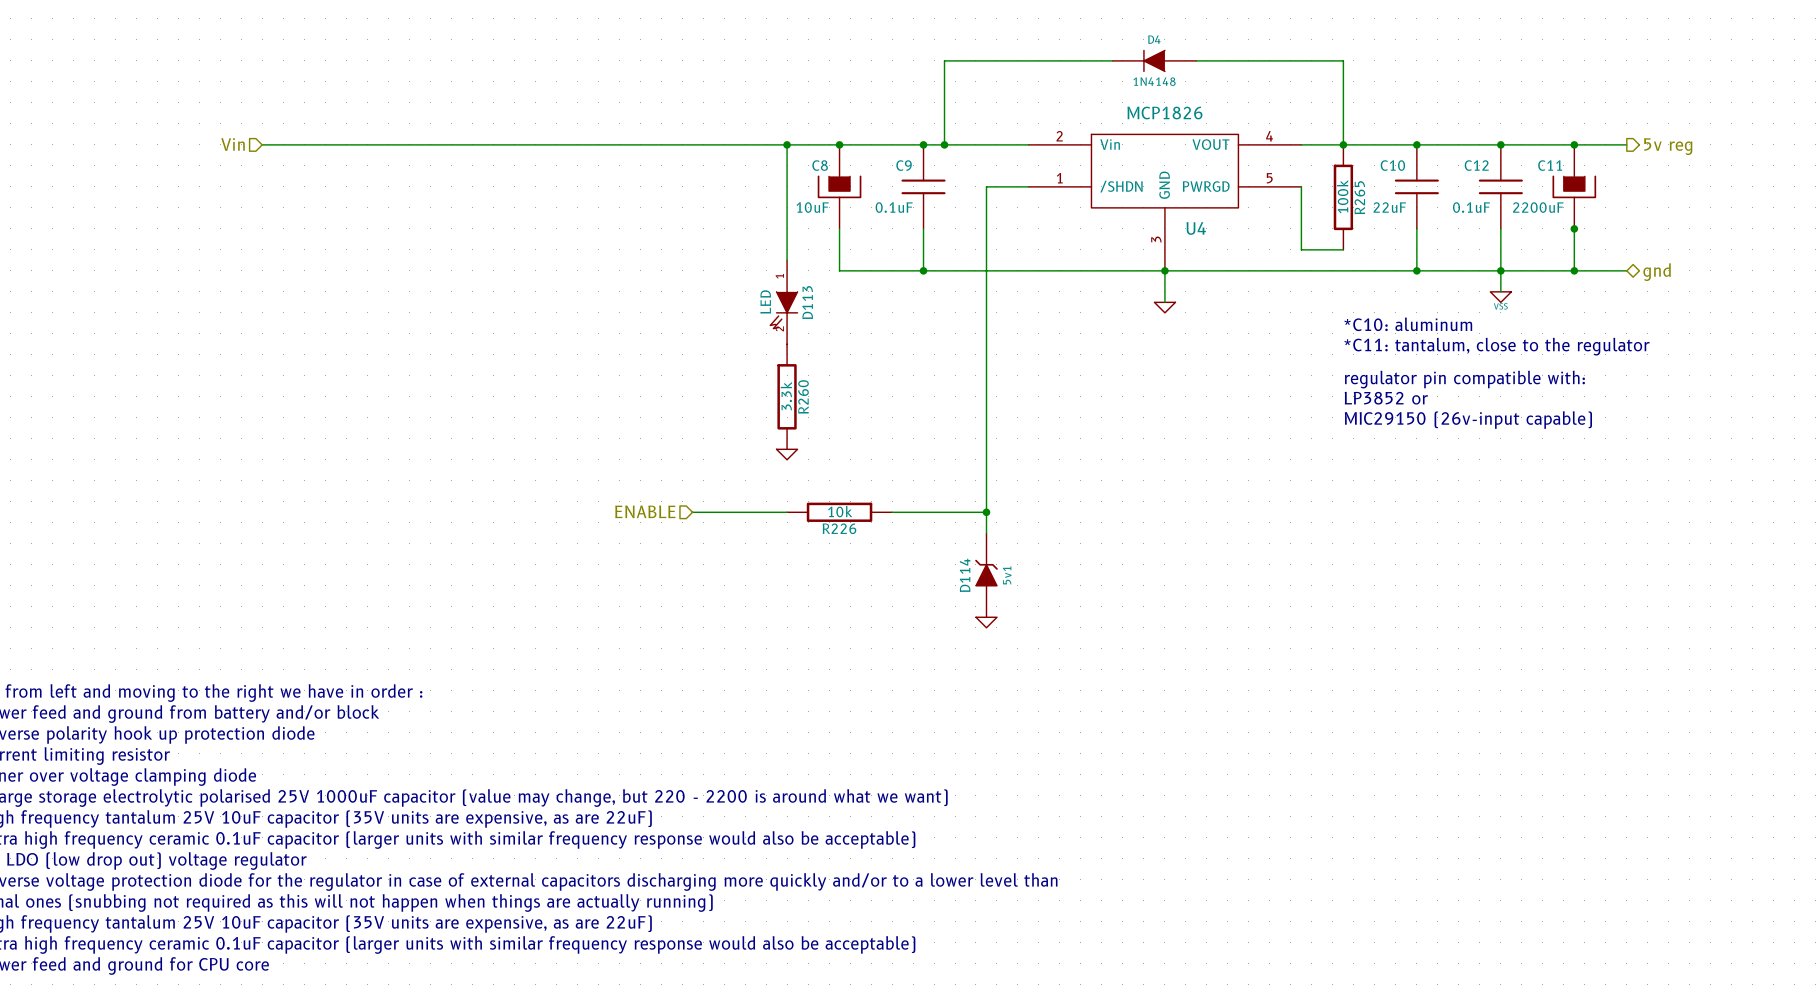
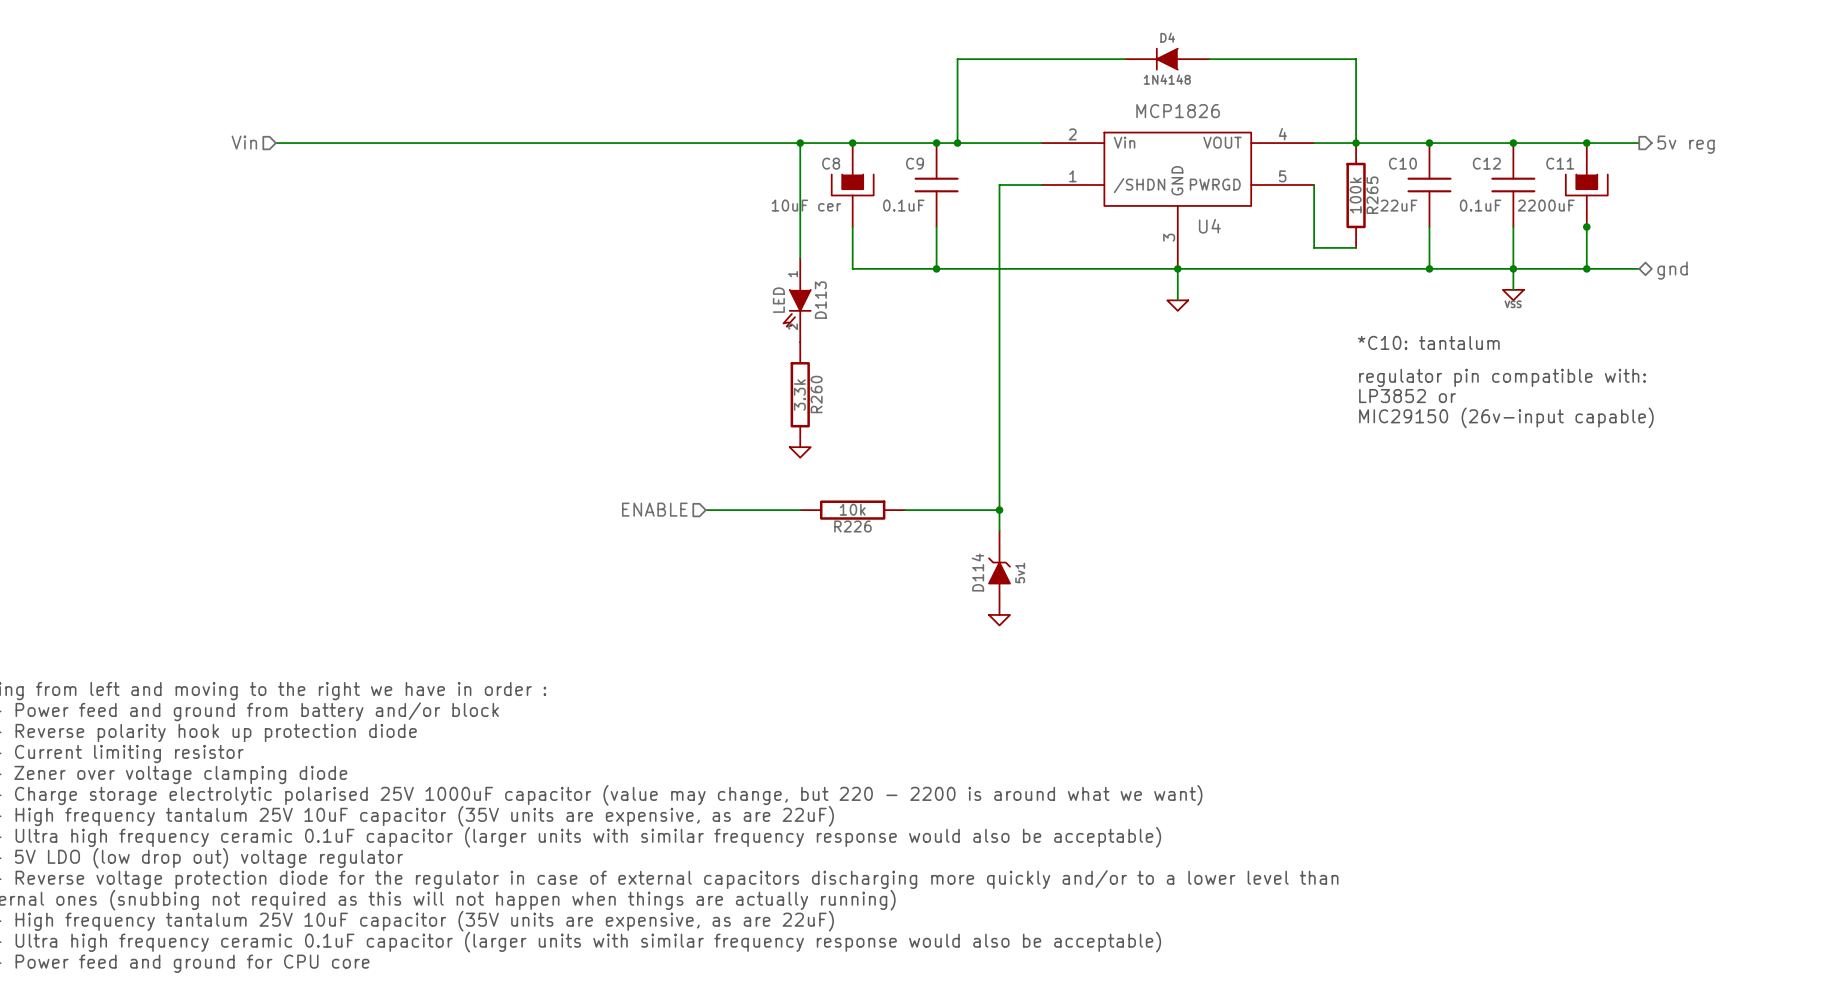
C8 value: 10uF (812, 207) -> 10uF cer (806, 205)
text: *C10: aluminum (1408, 324) -> none
text: *C11: tantalum, close to the regulator (1497, 346) -> *C10: tantalum (1428, 342)

